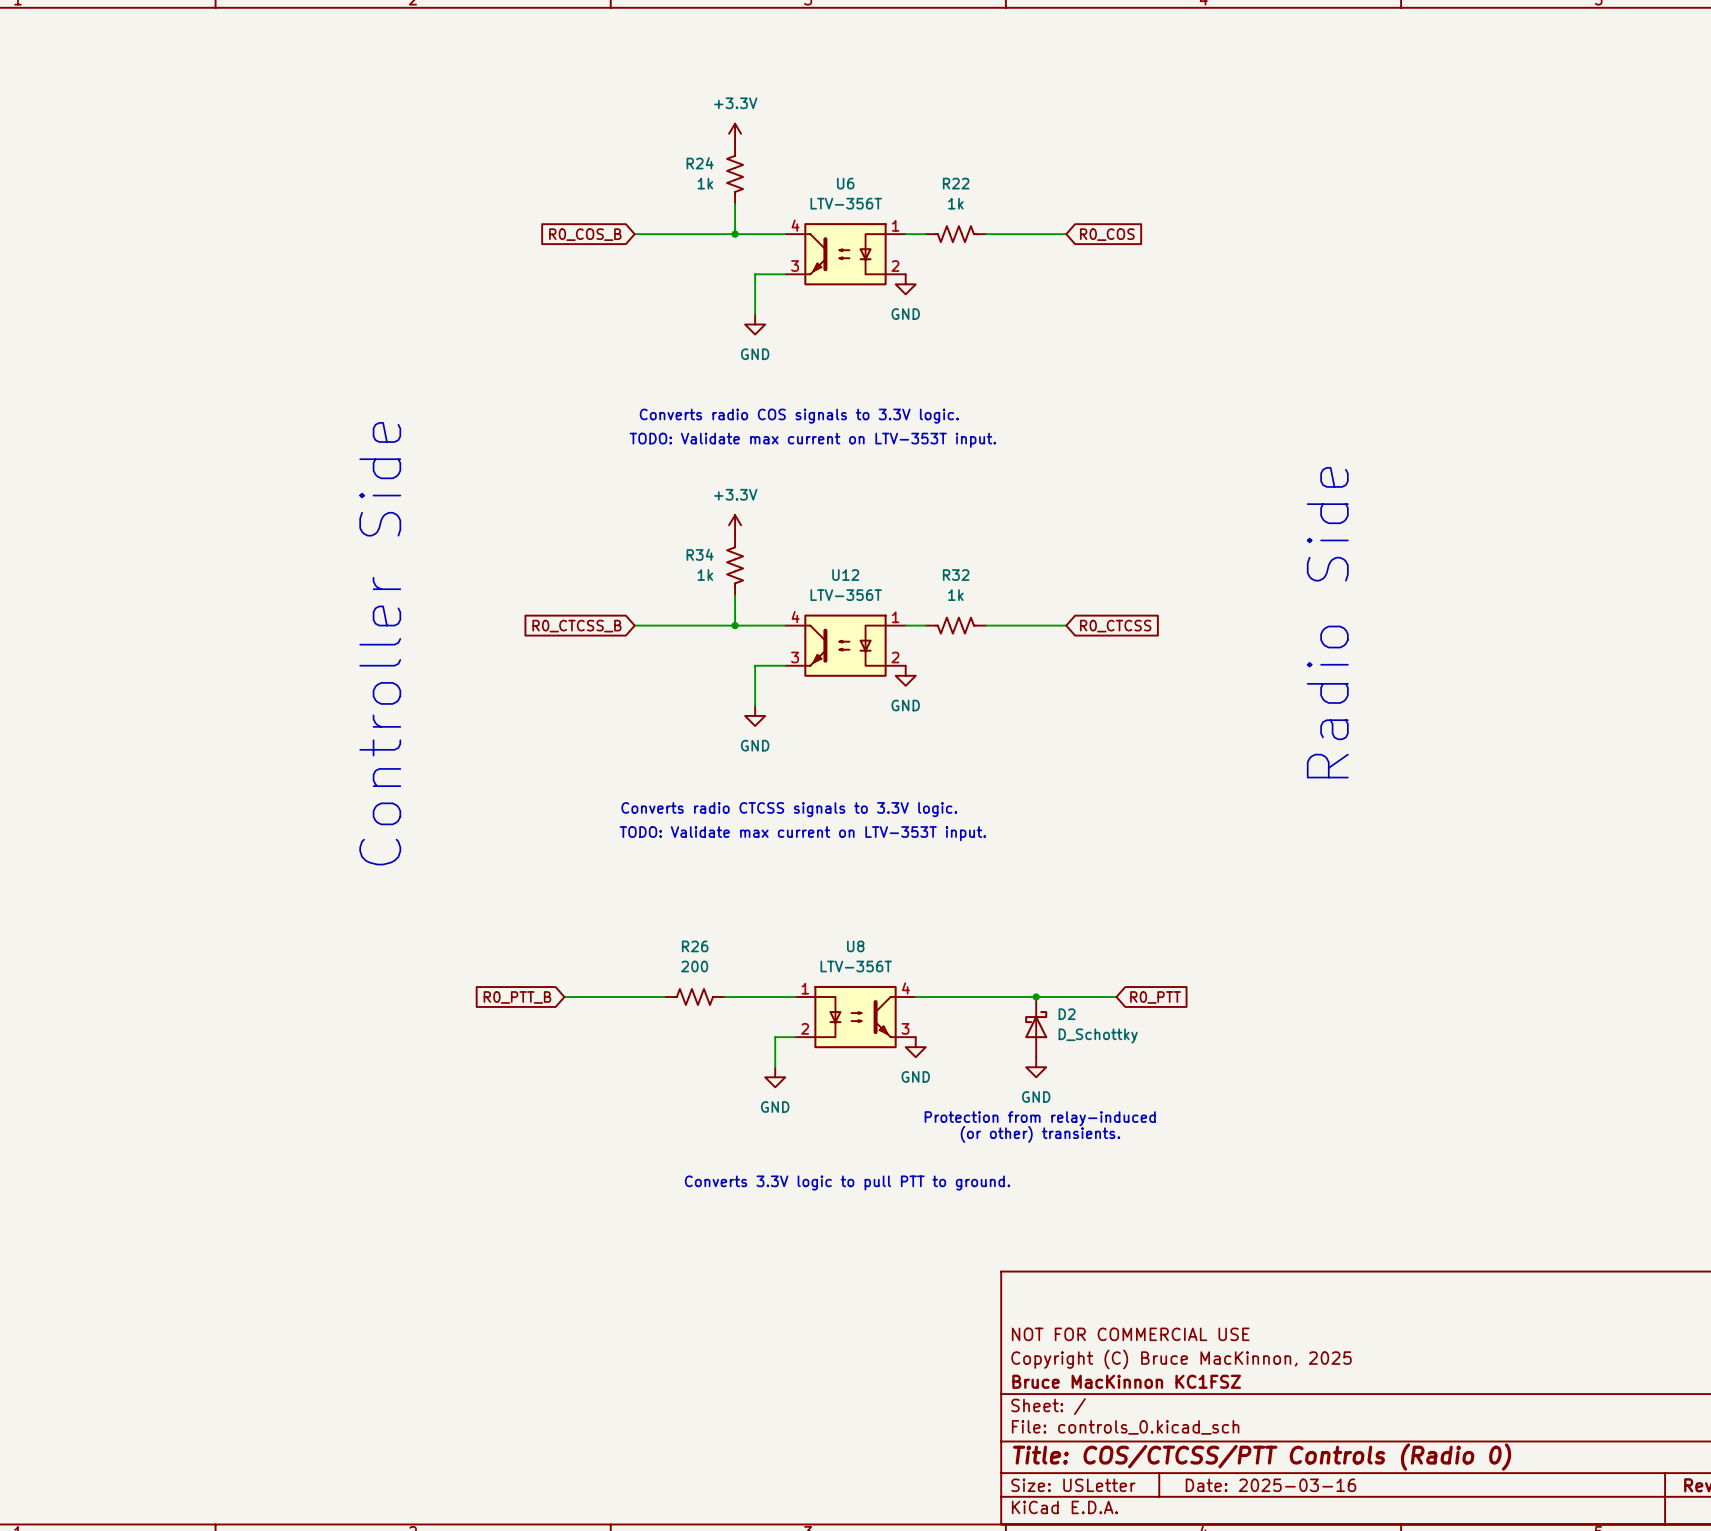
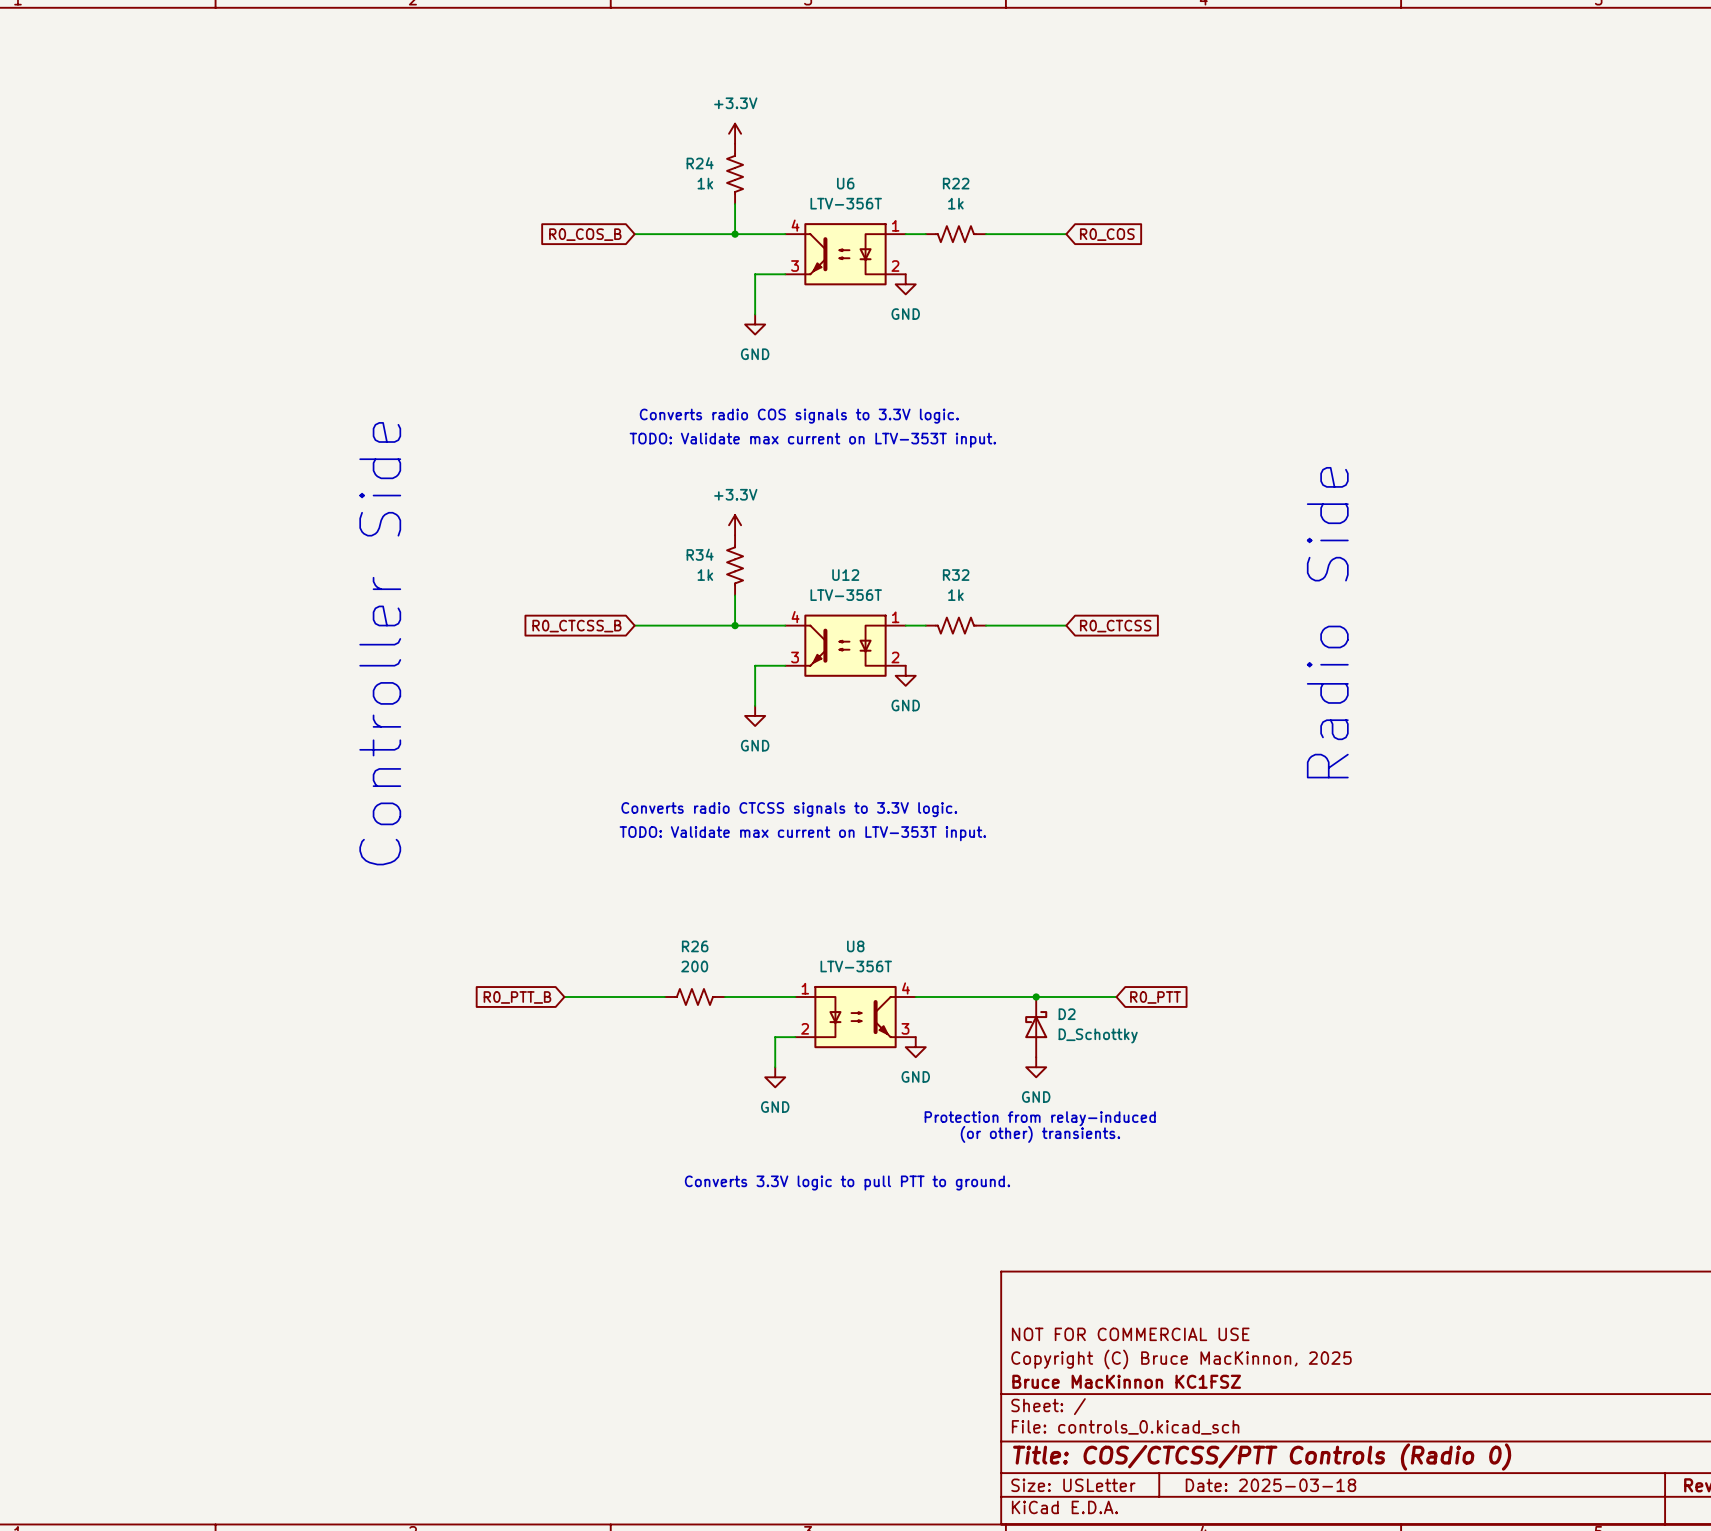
title block: Date: 2025-03-16 (1270, 1485) -> Date: 2025-03-18 (1270, 1485)

